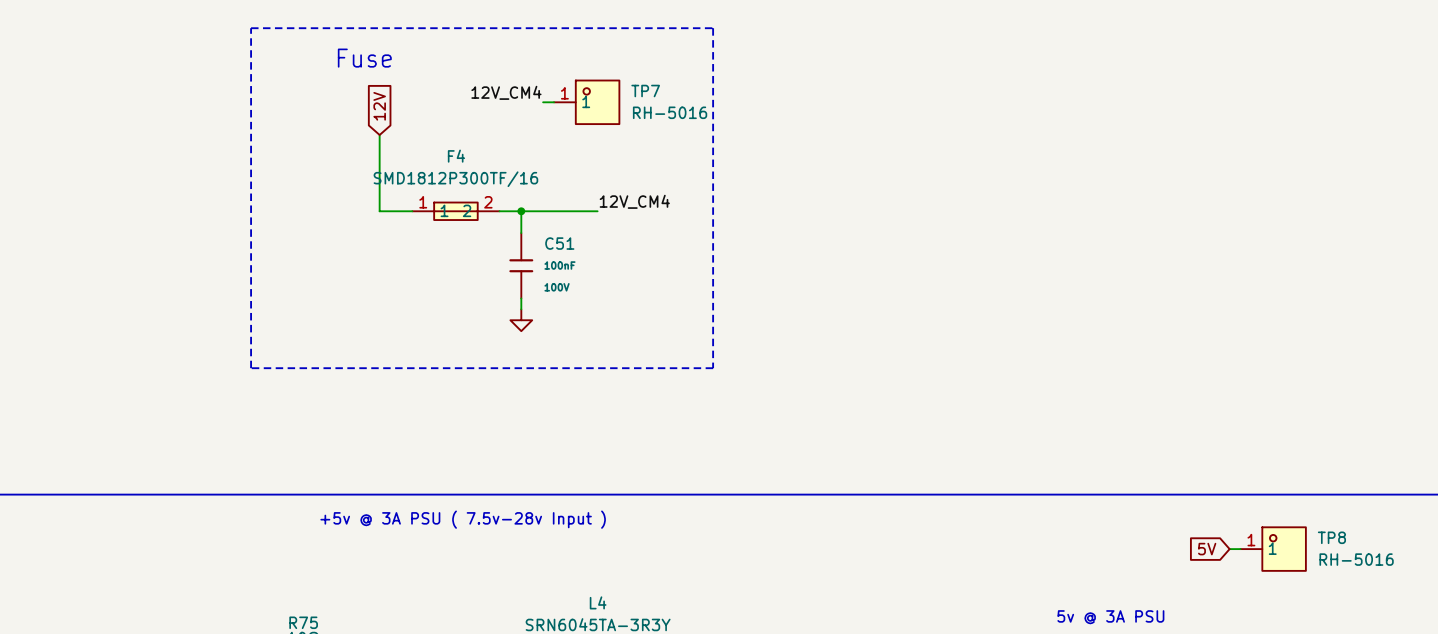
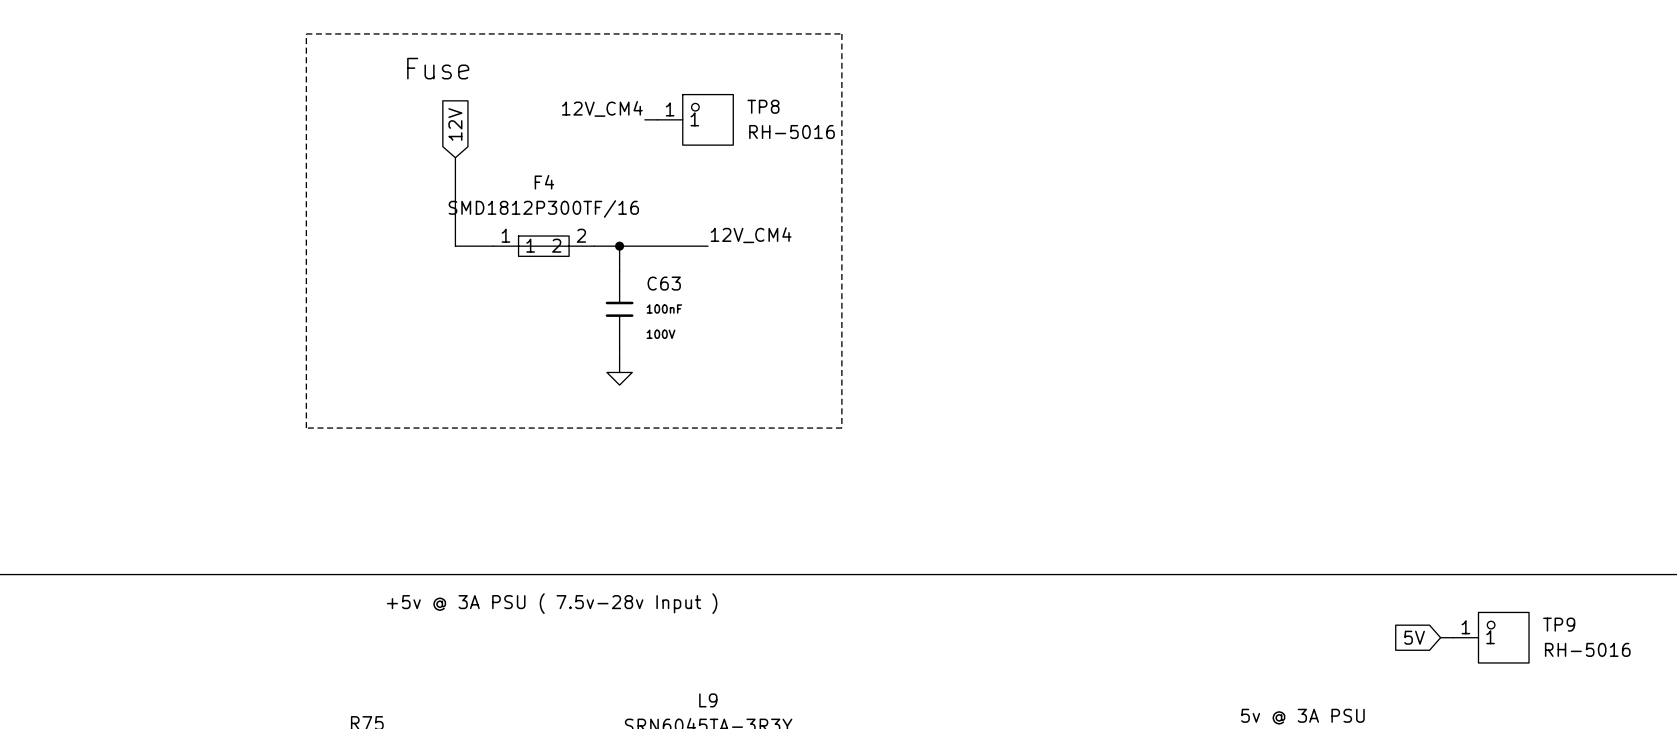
TP7 name: TP7 (645, 91) -> TP8 (763, 106)
C51 name: C51 (559, 243) -> C63 (664, 283)
TP8 name: TP8 (1331, 537) -> TP9 (1559, 624)
L4 name: L4 (598, 602) -> L9 (708, 700)

